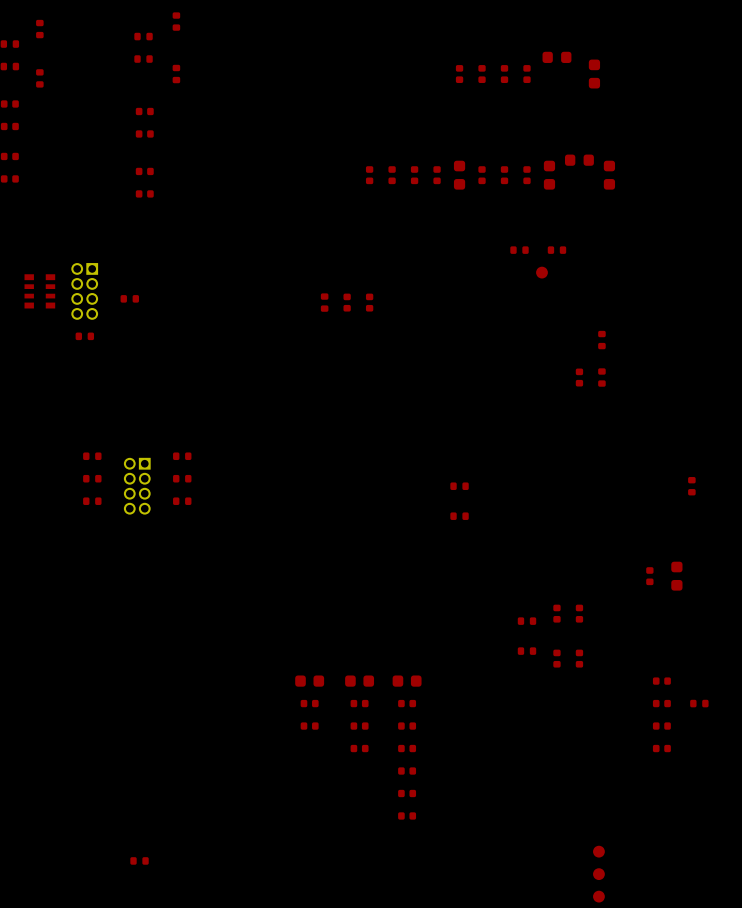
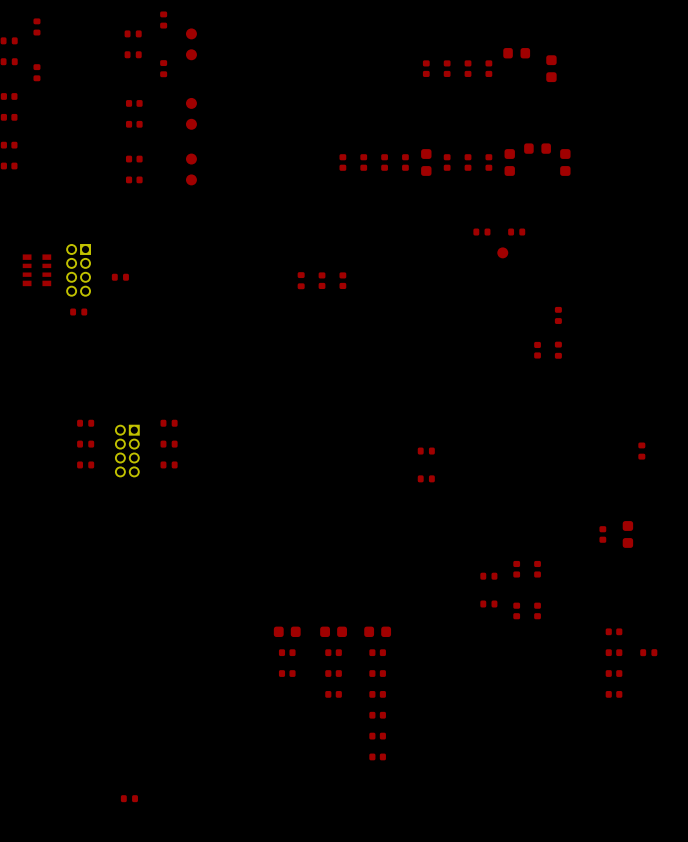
part: none -> (191, 33)
part: none -> (191, 54)
part: none -> (191, 103)
part: none -> (191, 124)
part: none -> (191, 159)
part: none -> (191, 179)
part: (598, 851) -> none
part: (598, 874) -> none
part: (598, 896) -> none

